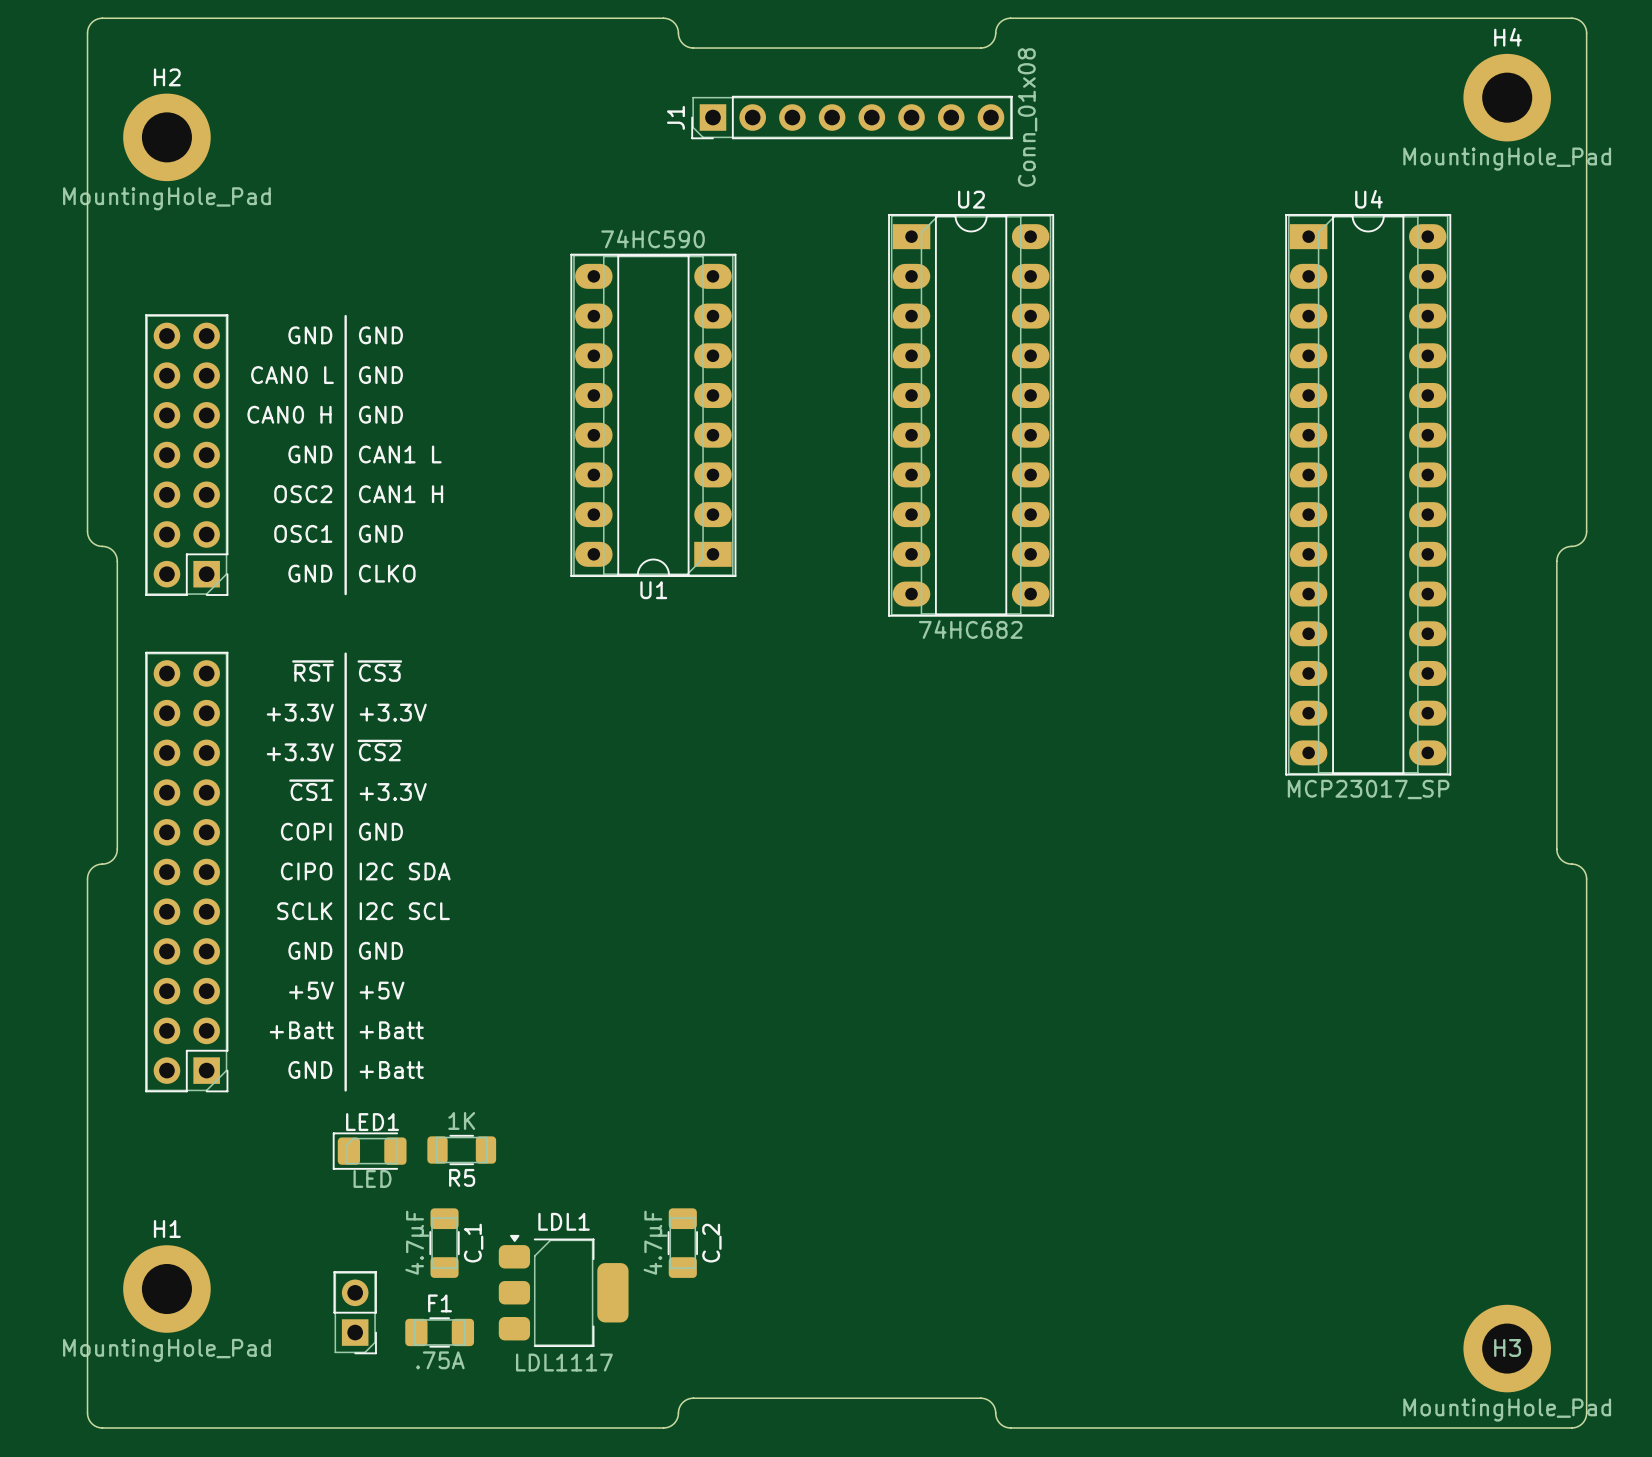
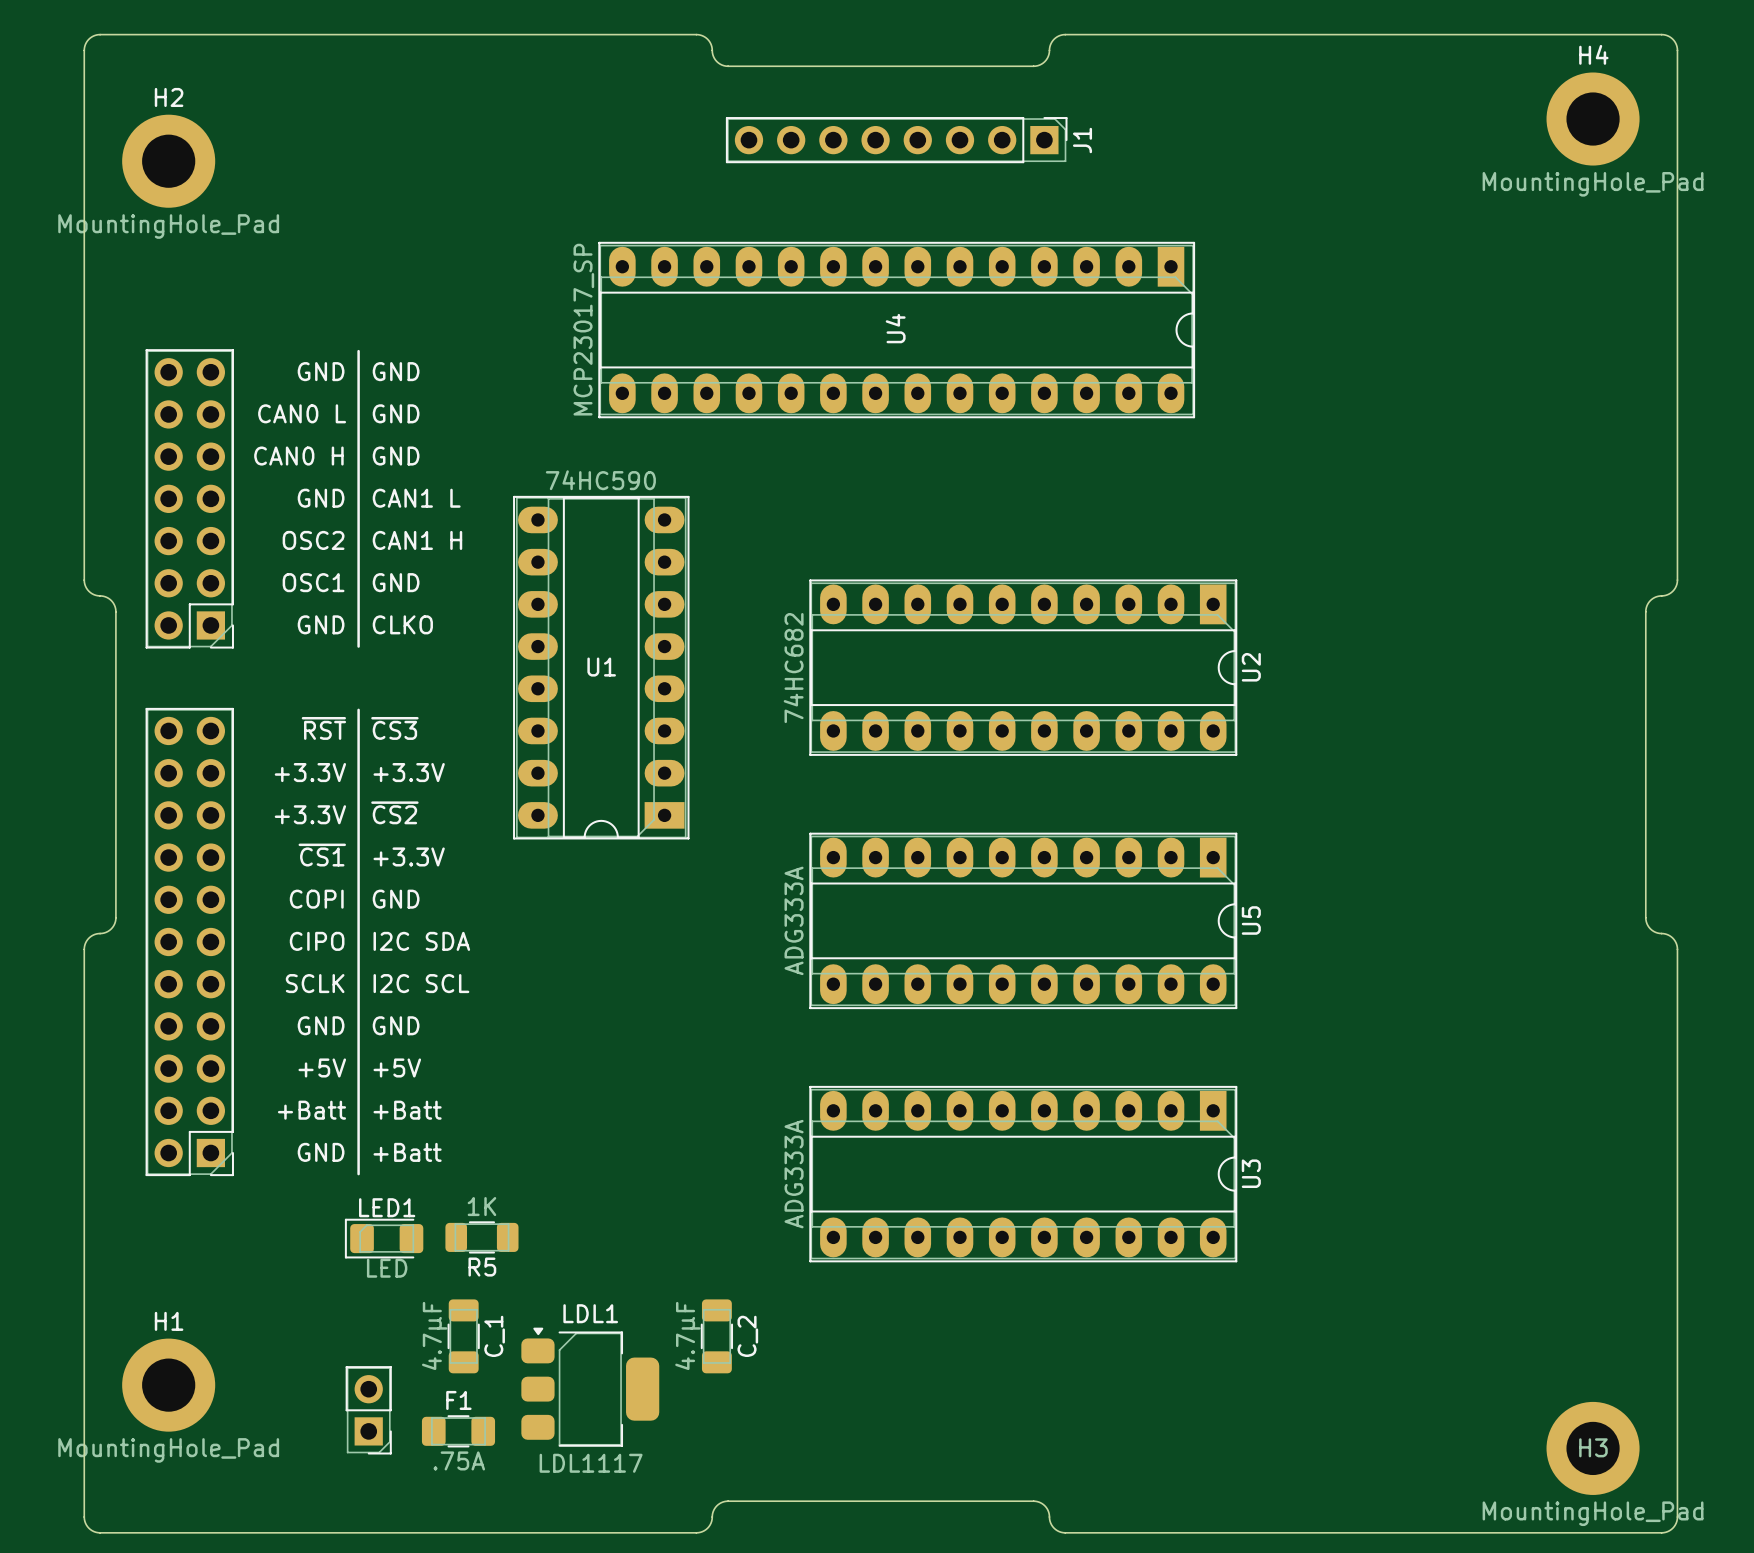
J1 rotation: 0° (851, 117) -> 180° (896, 140)
J1 value: Conn_01x08 (1027, 117) -> none
U4 name position: U4 (1368, 199) -> U4 (895, 328)
U1 position: (653, 415) -> (601, 667)
U2 rotation: 0° (971, 415) -> 90° clockwise (1023, 667)
U4 rotation: 0° (1368, 494) -> 90° clockwise (896, 330)
U4 position: (1368, 494) -> (896, 330)
U1 name position: U1 (653, 590) -> U1 (601, 667)
U5: none -> ADG333A (1023, 920)
U3: none -> ADG333A (1023, 1174)

